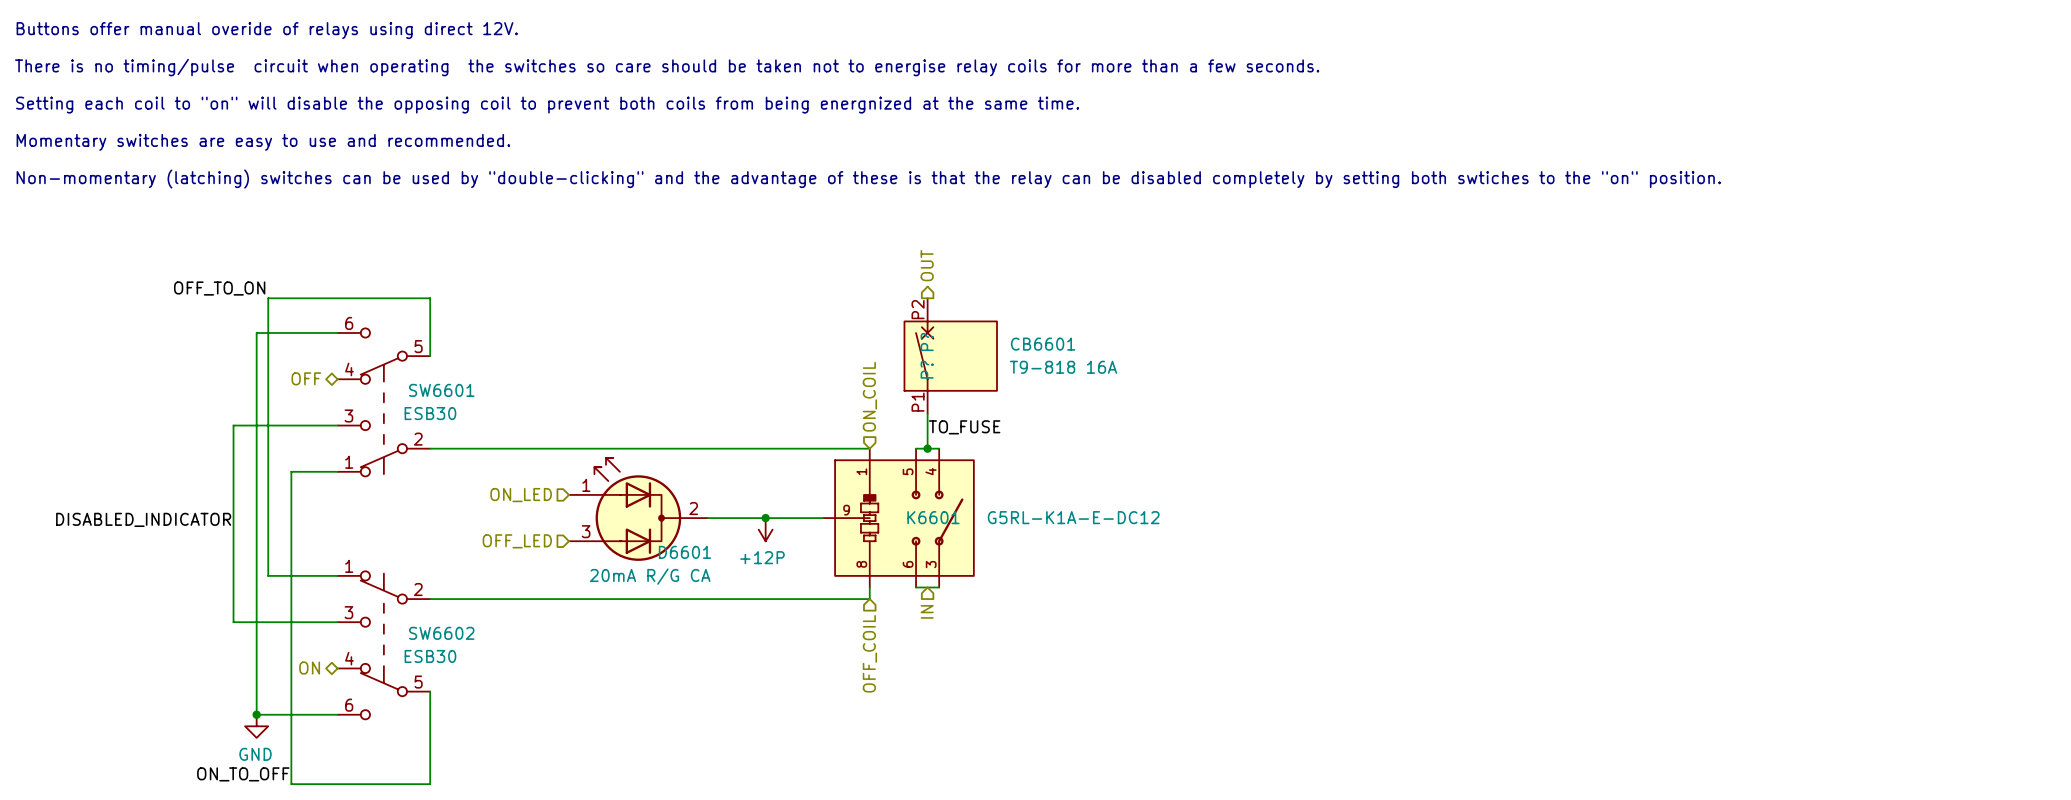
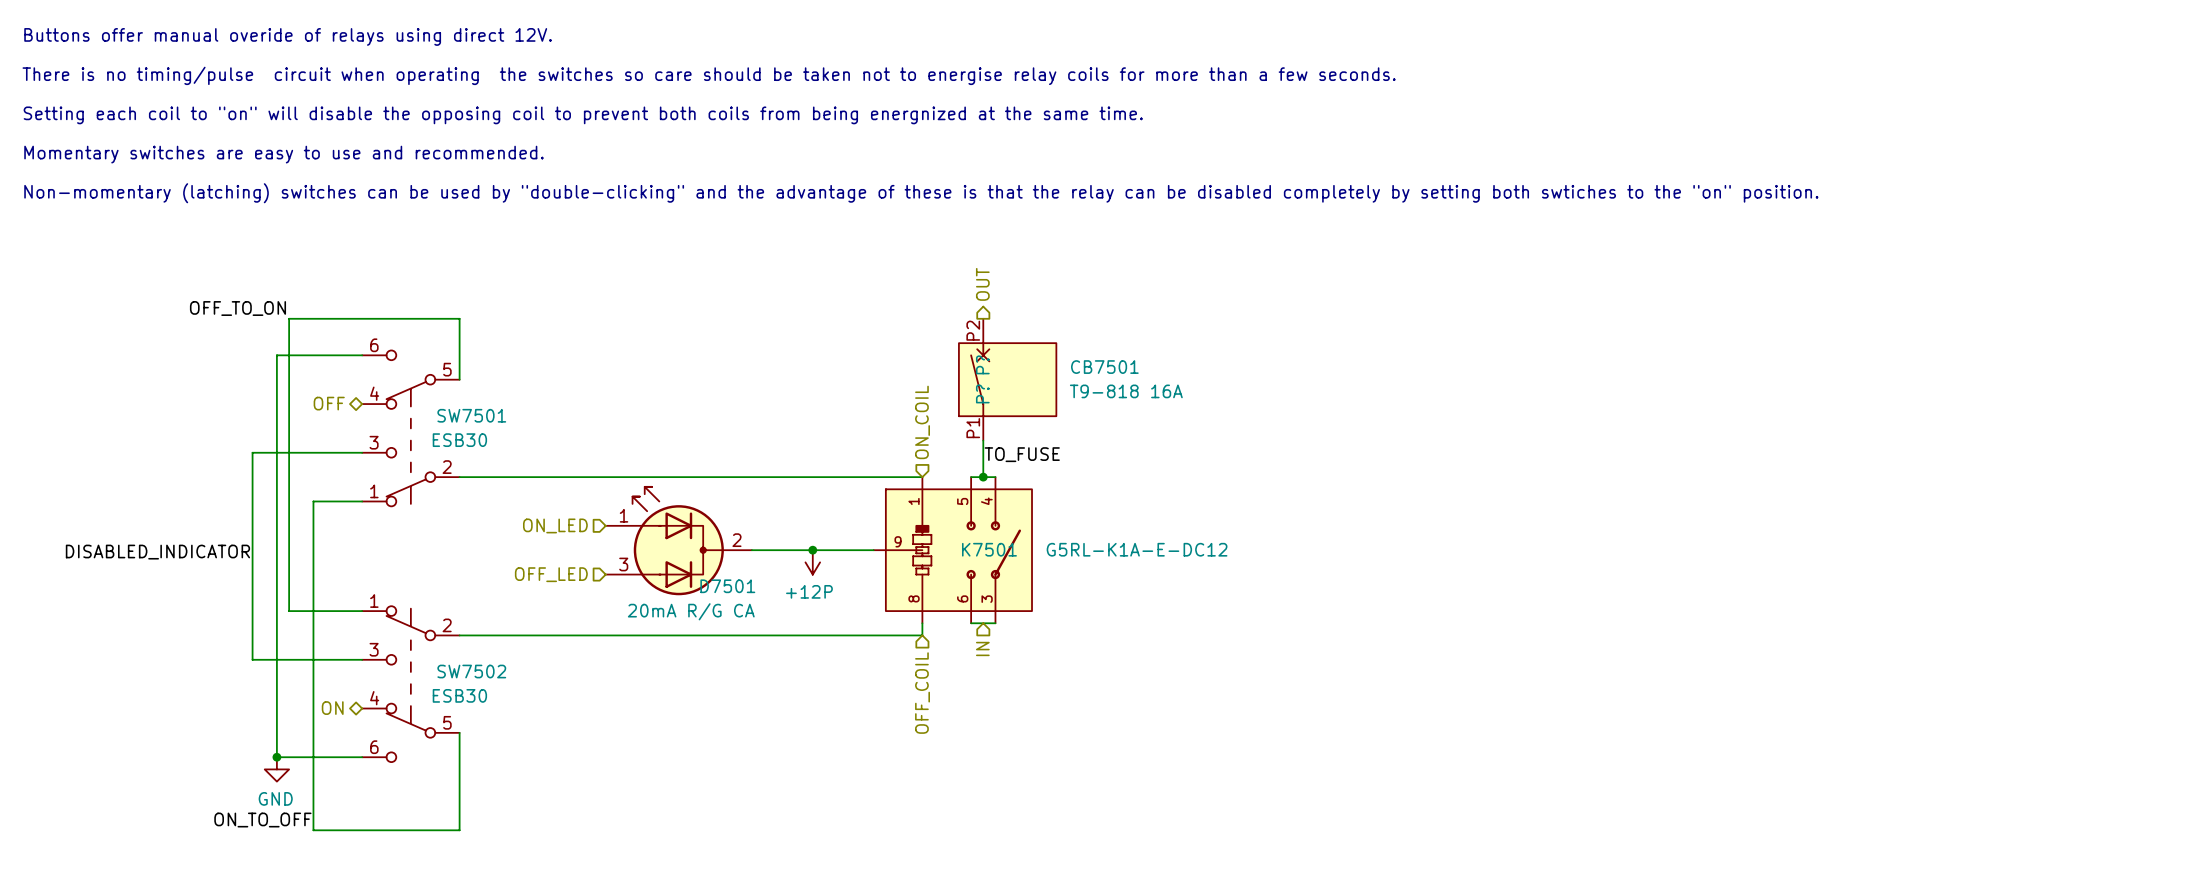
CB6601 name: CB6601 (1043, 344) -> CB7501 (1104, 367)
SW6601 name: SW6601 (441, 390) -> SW7501 (471, 415)
K6601 name: K6601 (933, 517) -> K7501 (989, 549)
D6601 name: D6601 (684, 552) -> D7501 (727, 586)
SW6602 name: SW6602 (441, 633) -> SW7502 (471, 671)

